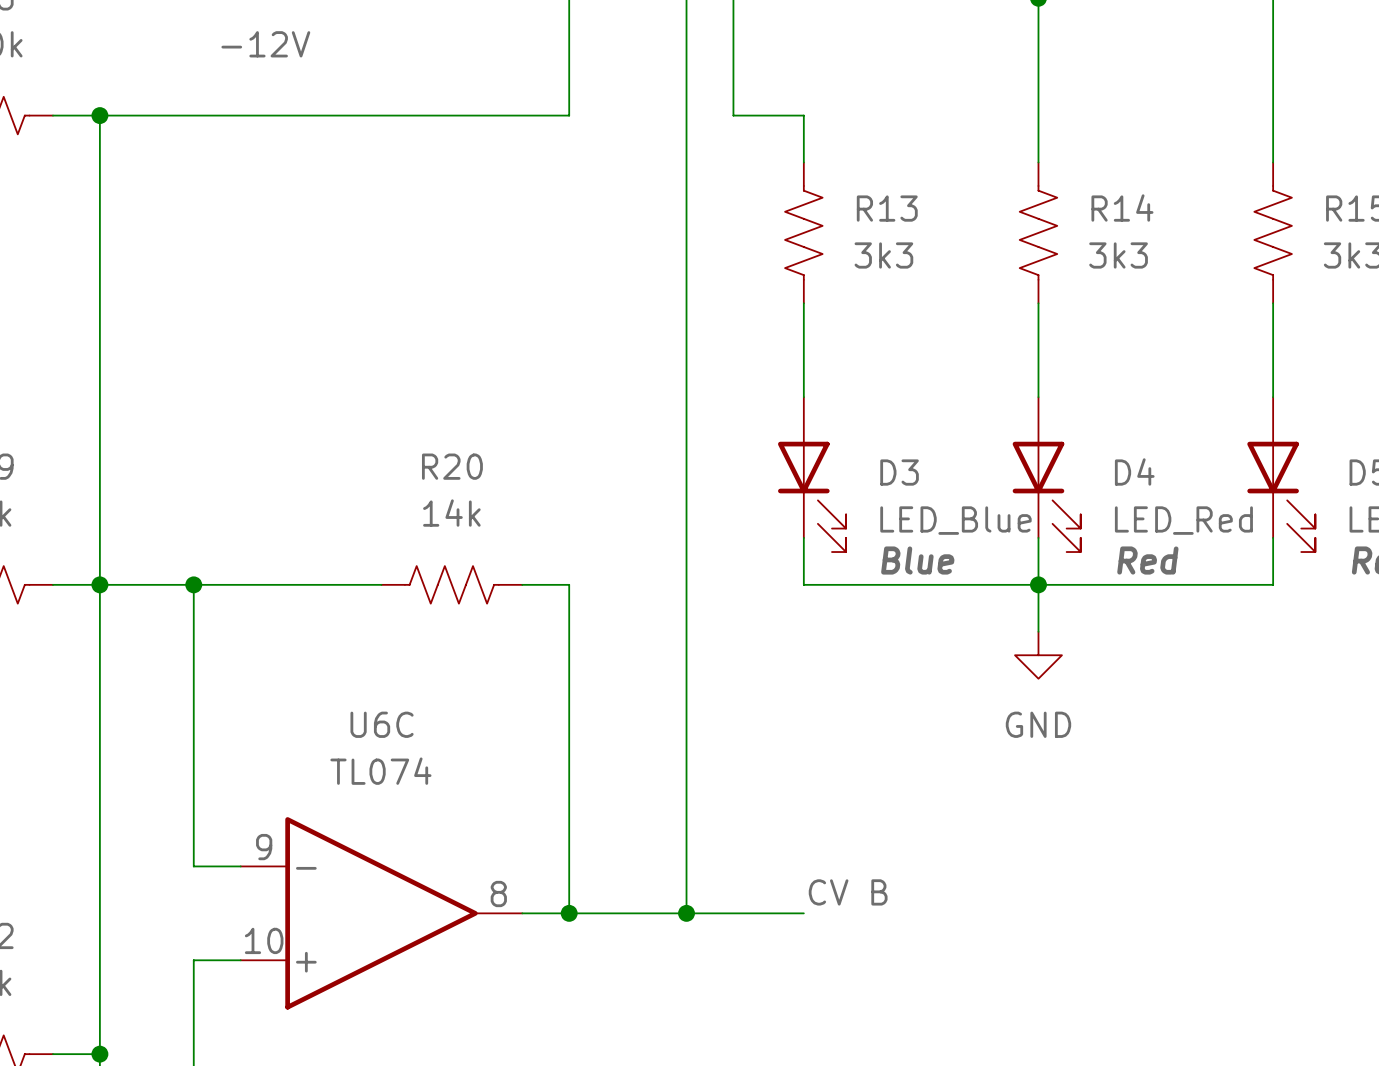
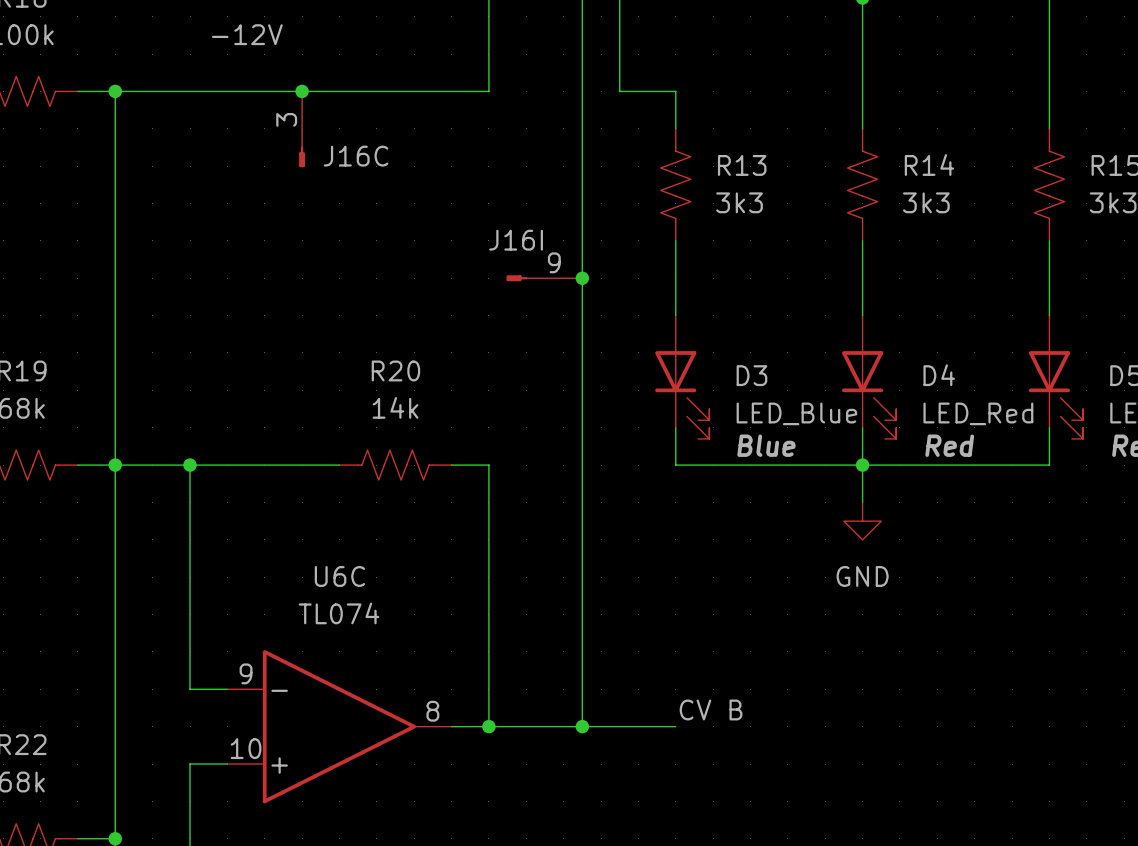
junction: none -> (302, 91)
J16C: none -> (302, 129)
J16I: none -> (544, 278)
junction: none -> (582, 278)

